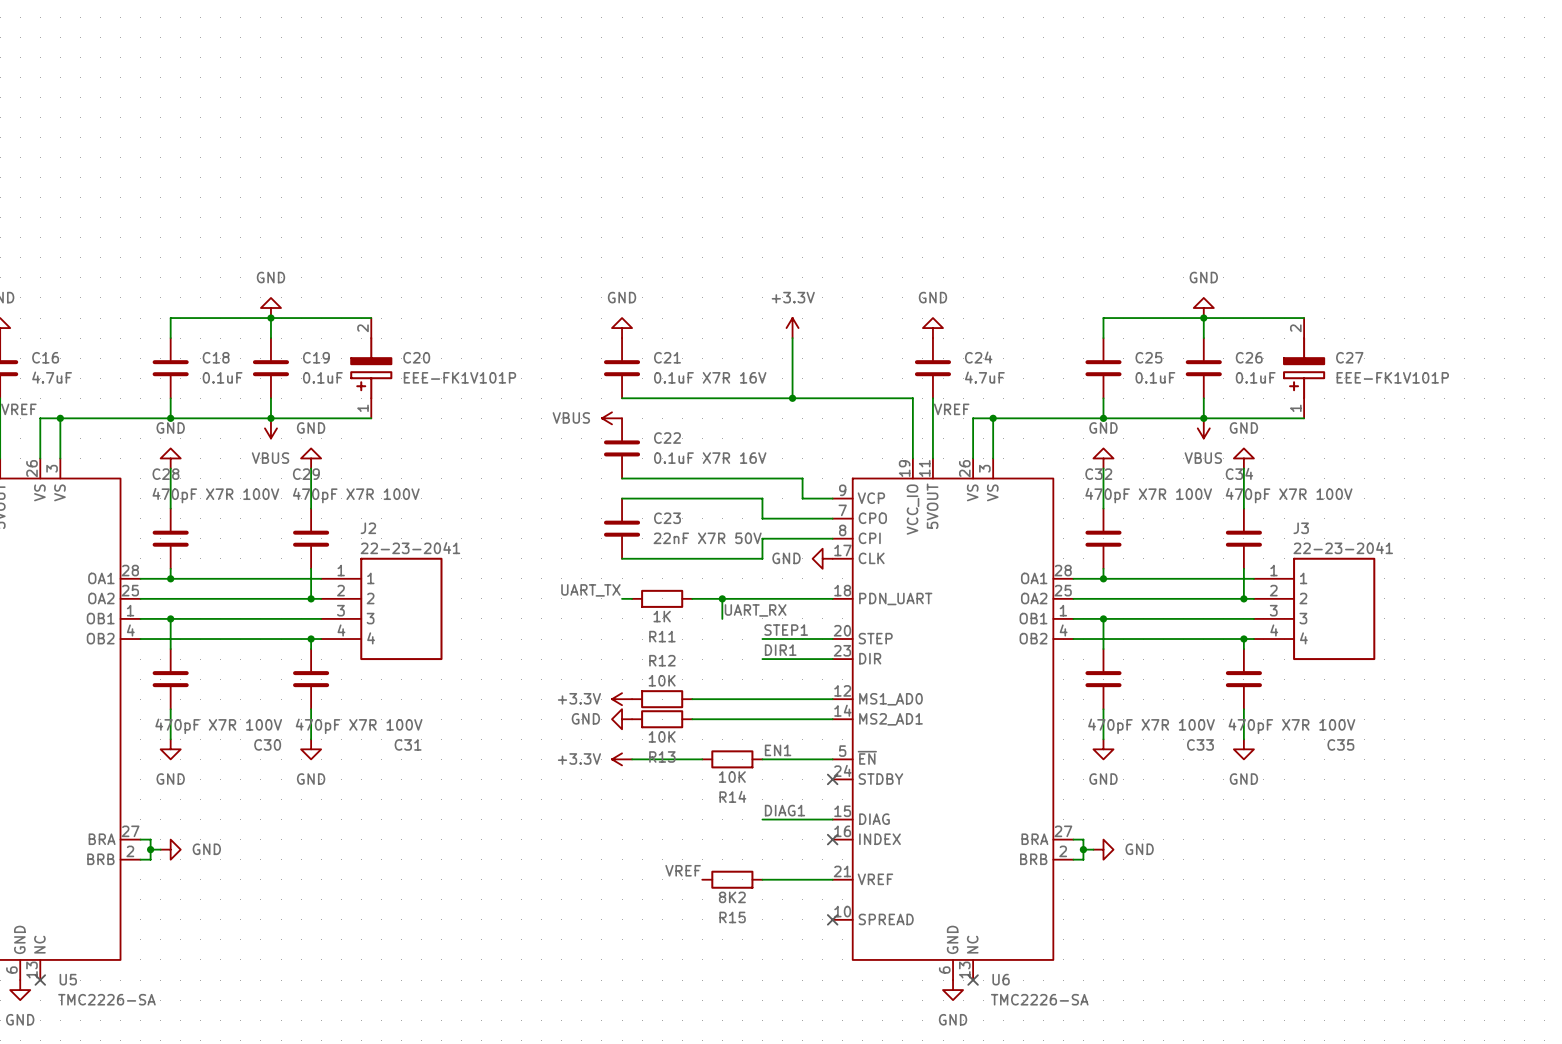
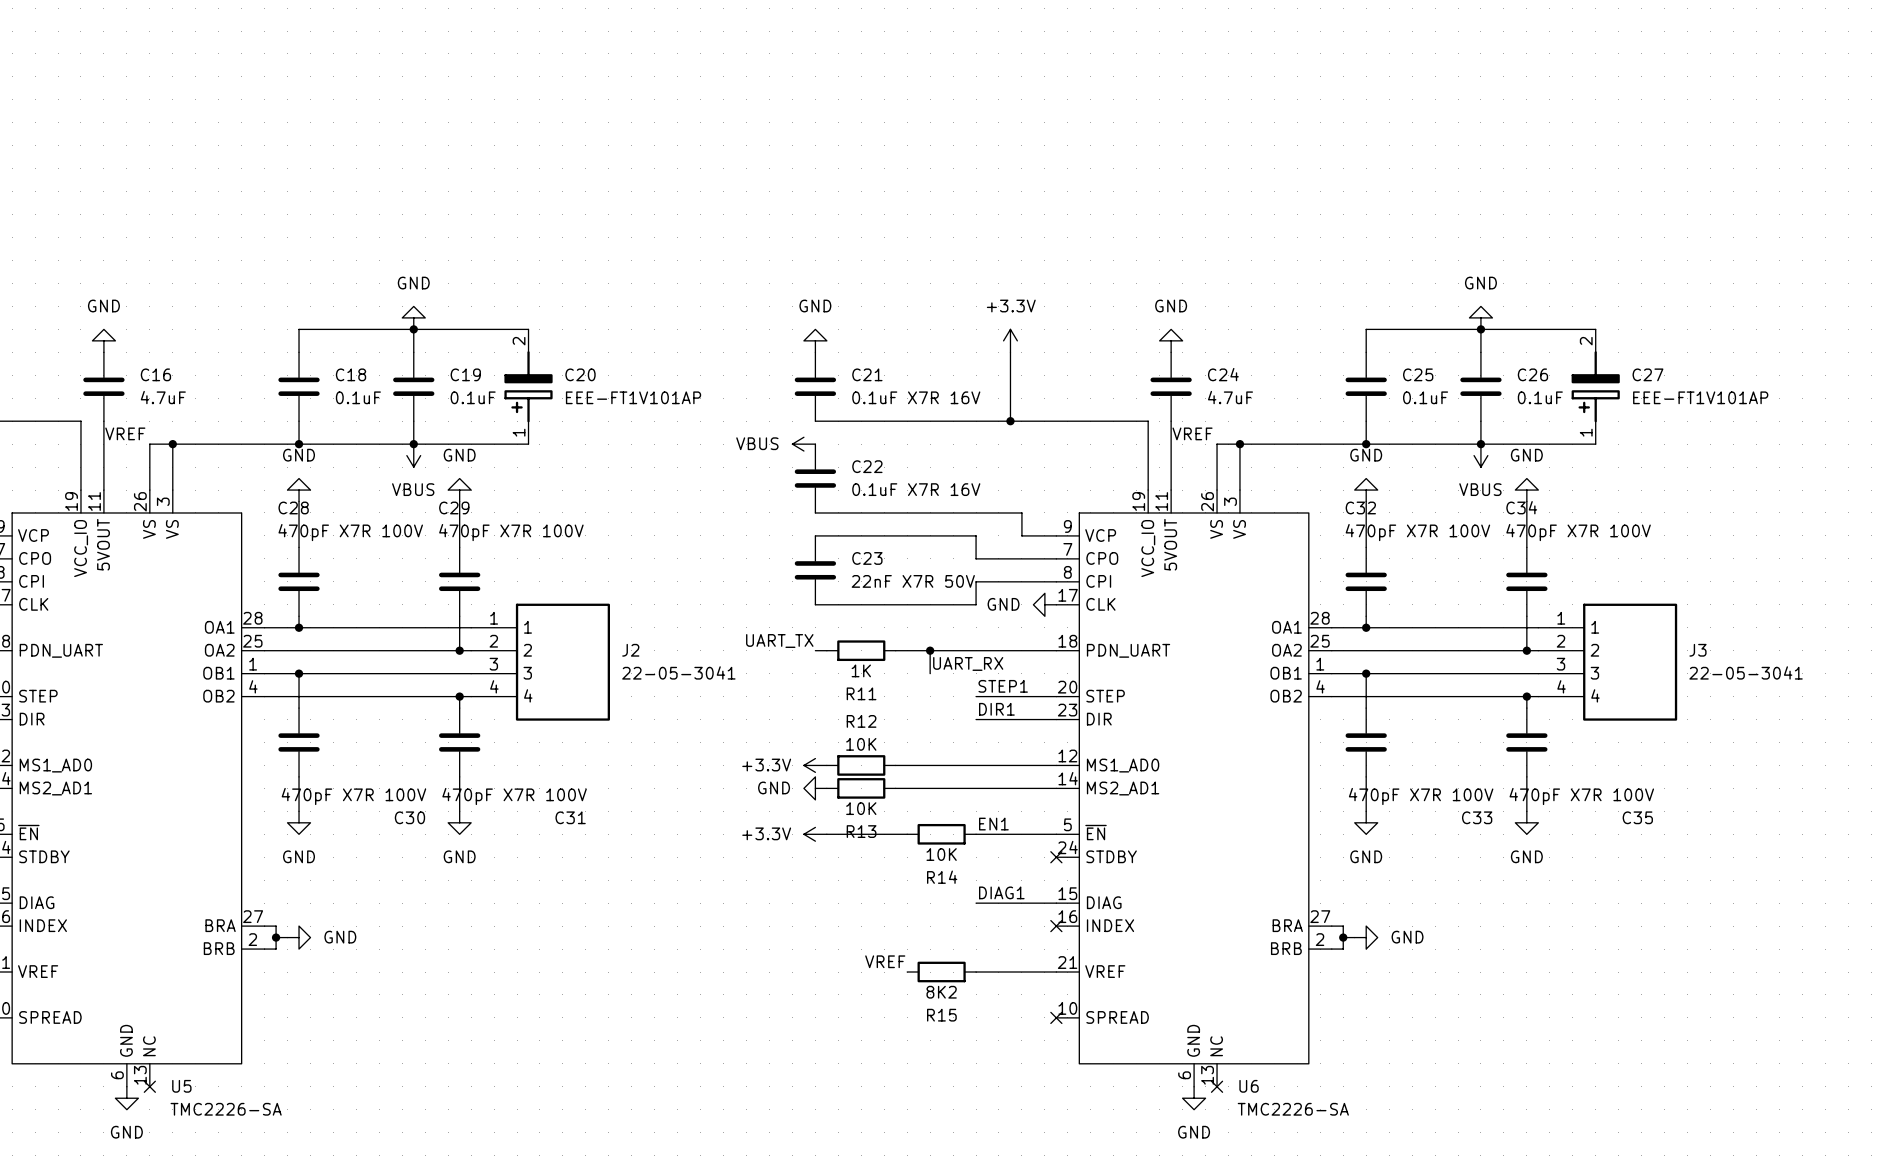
C20 value: EEE-FK1V101P (459, 377) -> EEE-FT1V101AP (633, 397)
C27 value: EEE-FK1V101P (1392, 377) -> EEE-FT1V101AP (1700, 397)
J2 name position: J2 (368, 528) -> J2 (630, 650)
J3 name position: J3 (1301, 528) -> J3 (1697, 650)
J2 value: 22-23-2041 (410, 548) -> 22-05-3041 (678, 672)
J3 value: 22-23-2041 (1343, 548) -> 22-05-3041 (1746, 672)

